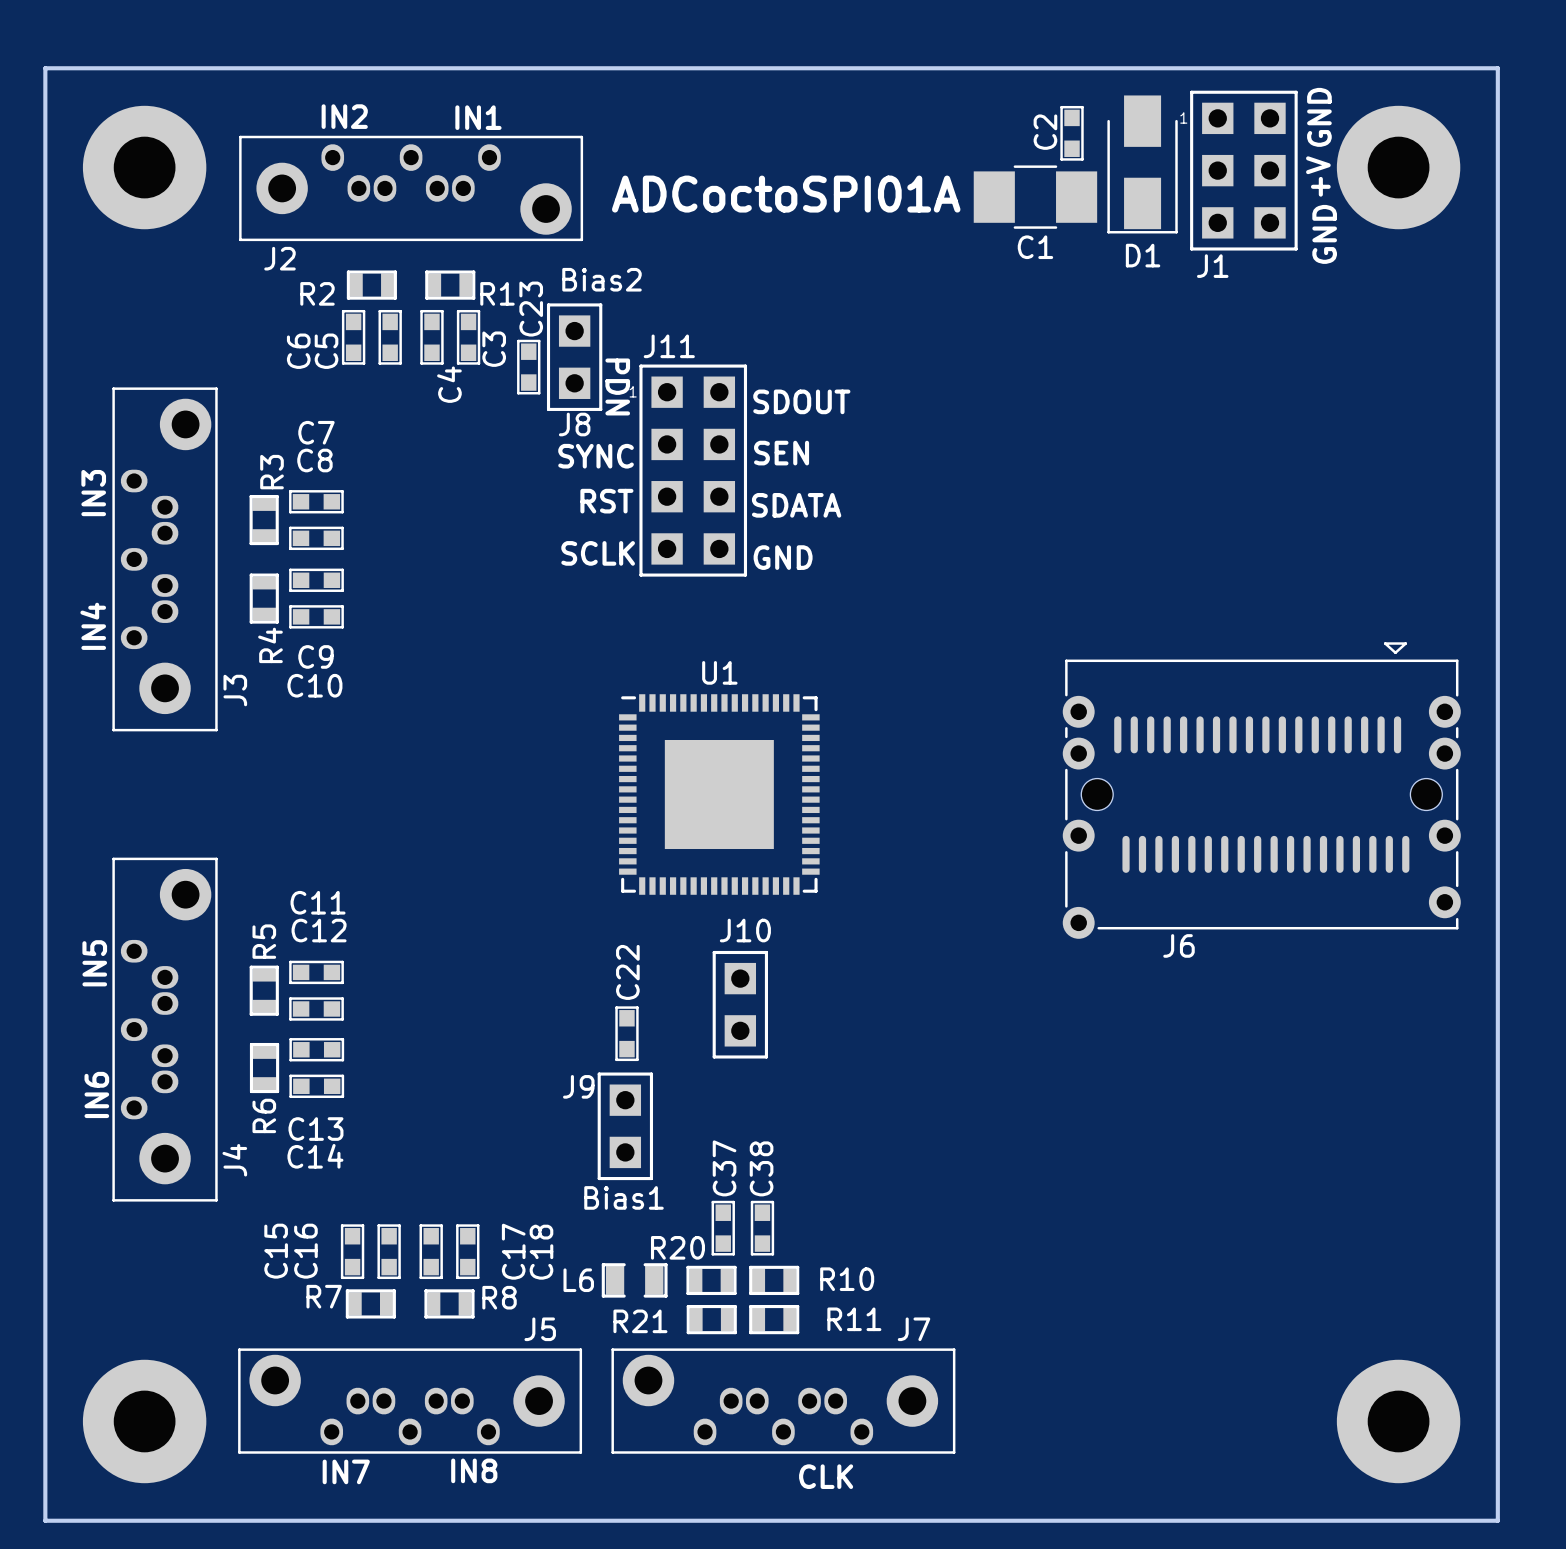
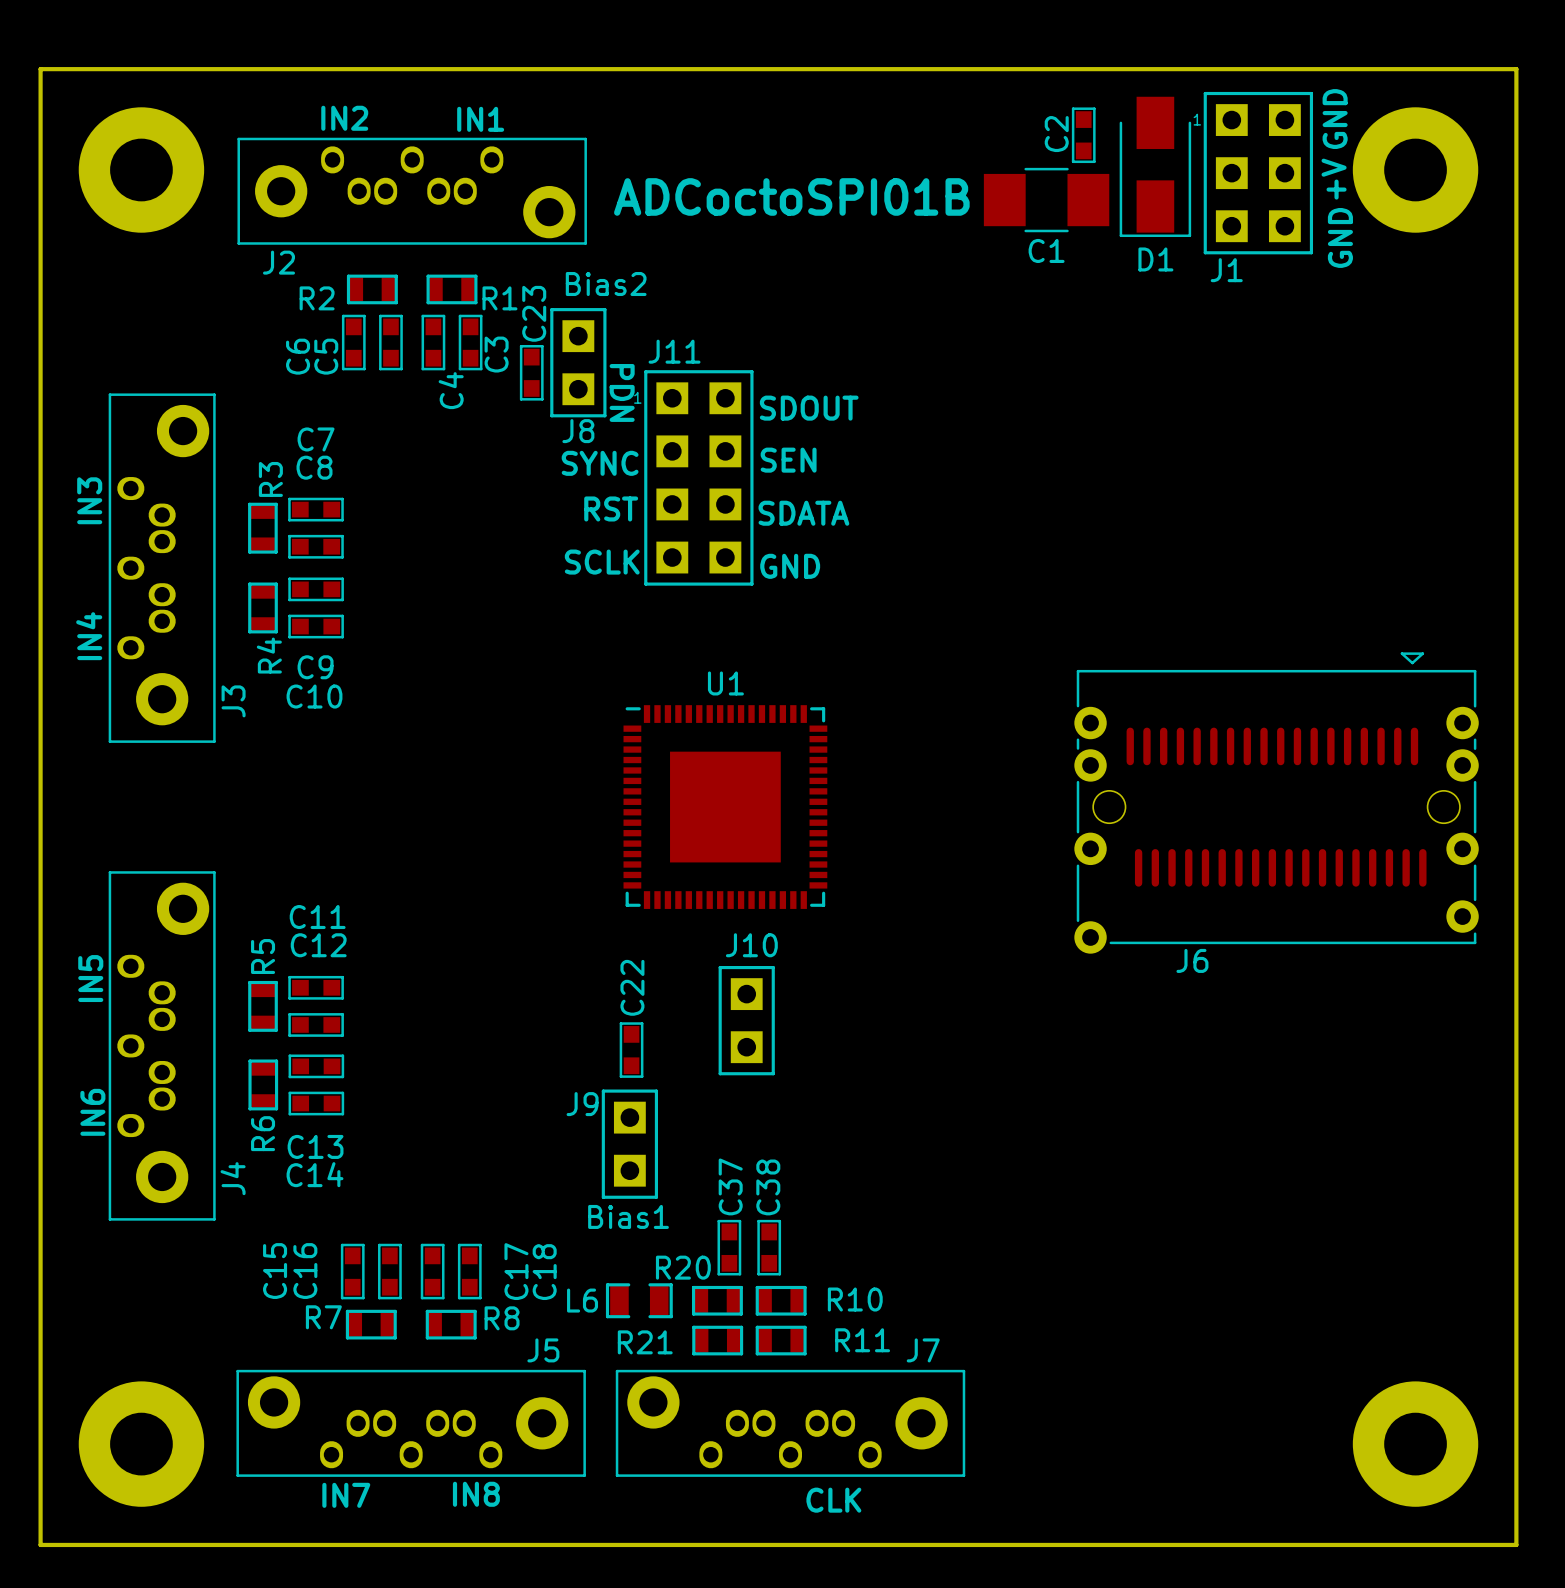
text: ADCoctoSPI01A (786, 194) -> ADCoctoSPI01B (791, 196)

